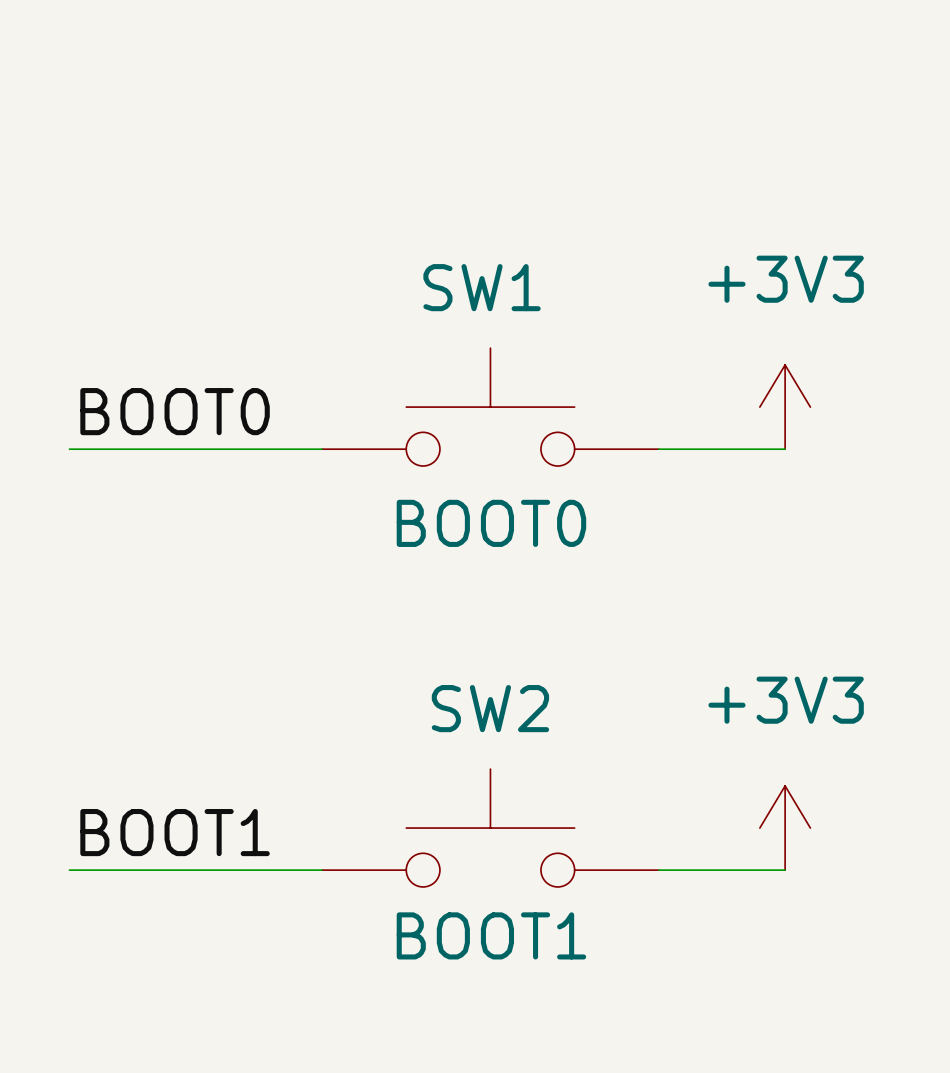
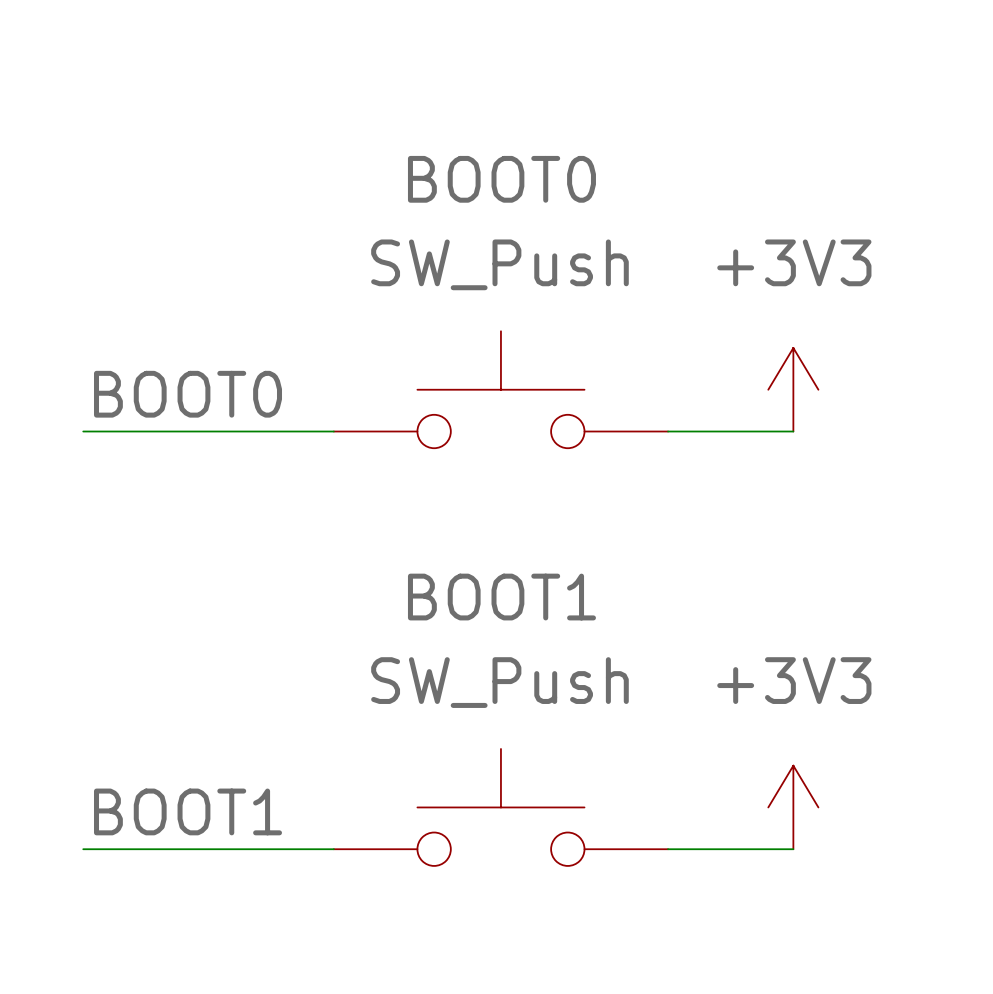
SW1 value: none -> SW_Push (499, 264)
SW1 name: SW1 (482, 287) -> BOOT0 (501, 179)
SW1 text: BOOT0 (491, 523) -> none
SW2 value: none -> SW_Push (499, 682)
SW2 name: SW2 (490, 708) -> BOOT1 (501, 597)
SW2 text: BOOT1 (491, 935) -> none

